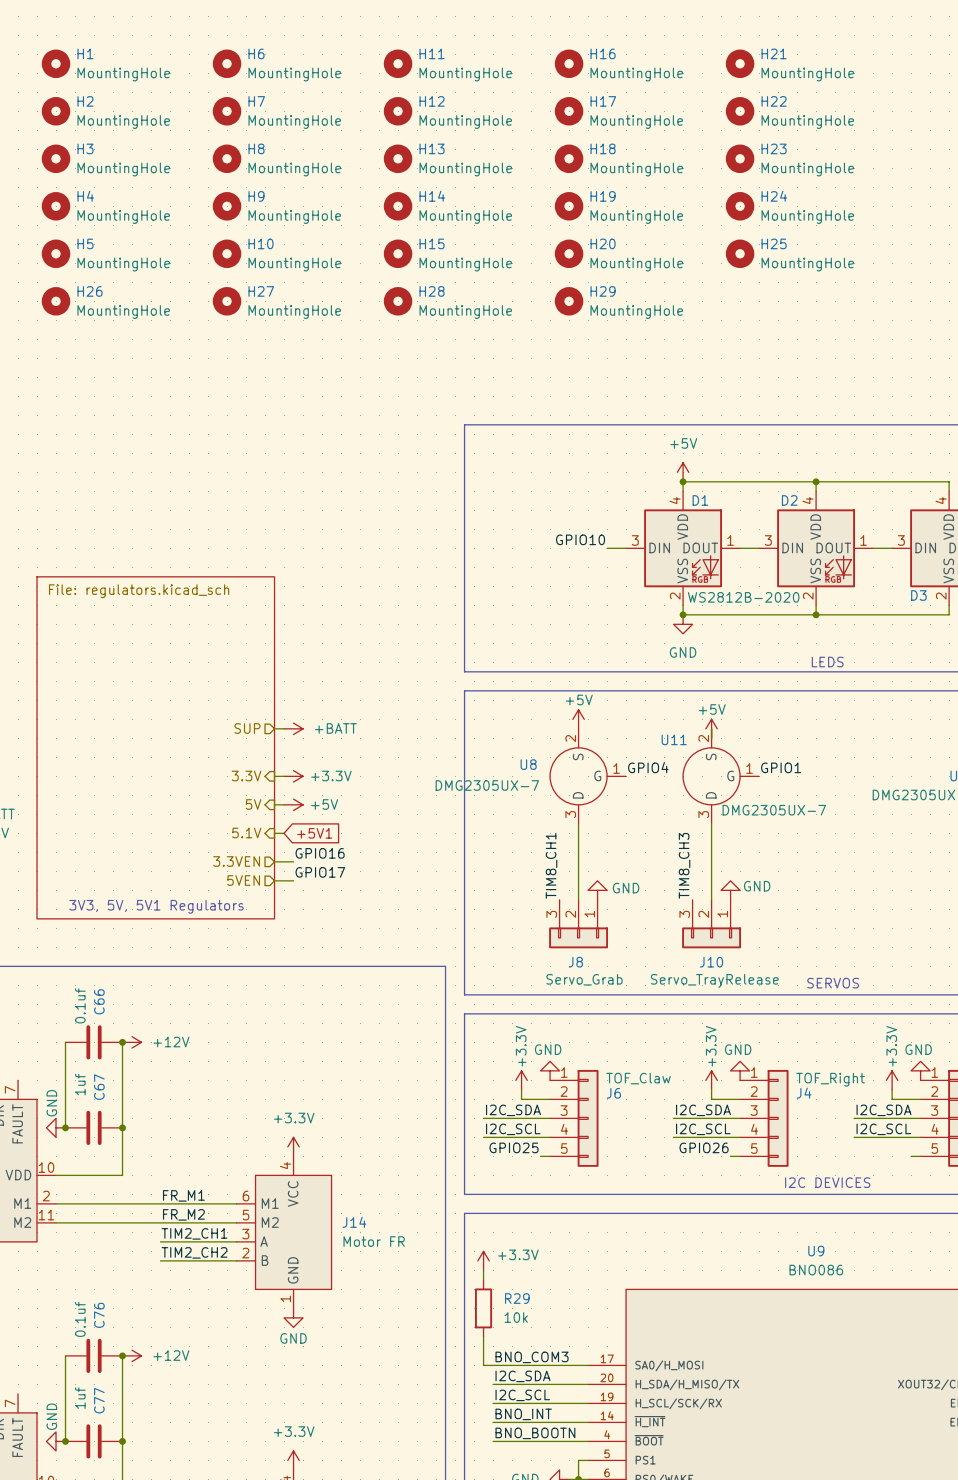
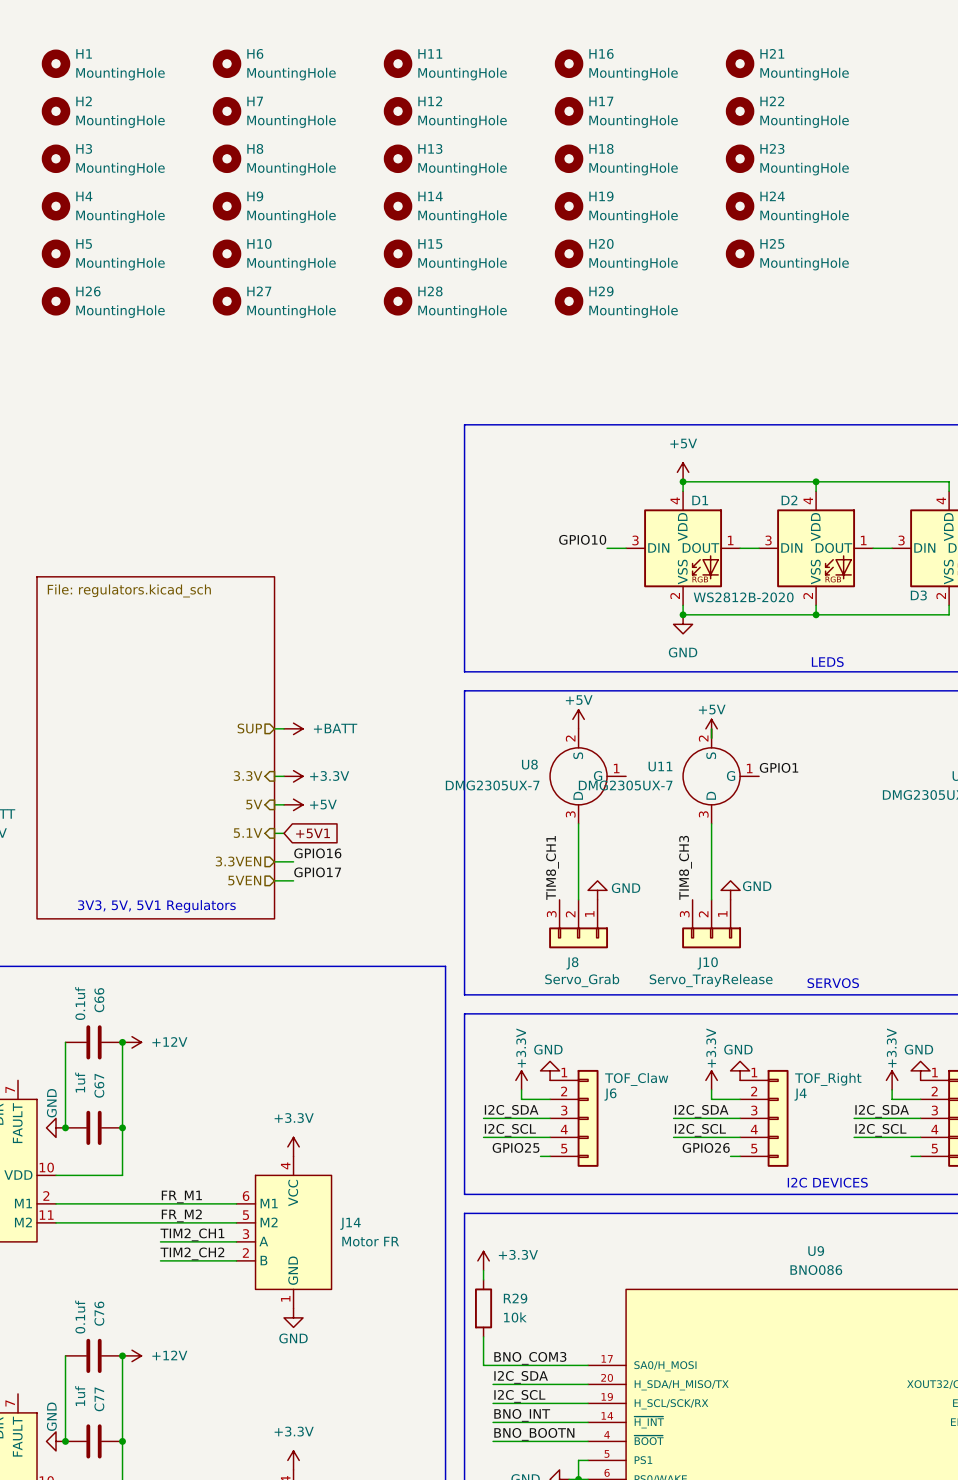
U11 name position: U11 (674, 739) -> U11 (660, 766)
label: GPIO4 (648, 767) -> none
U11 value position: DMG2305UX-7 (774, 810) -> DMG2305UX-7 (625, 785)

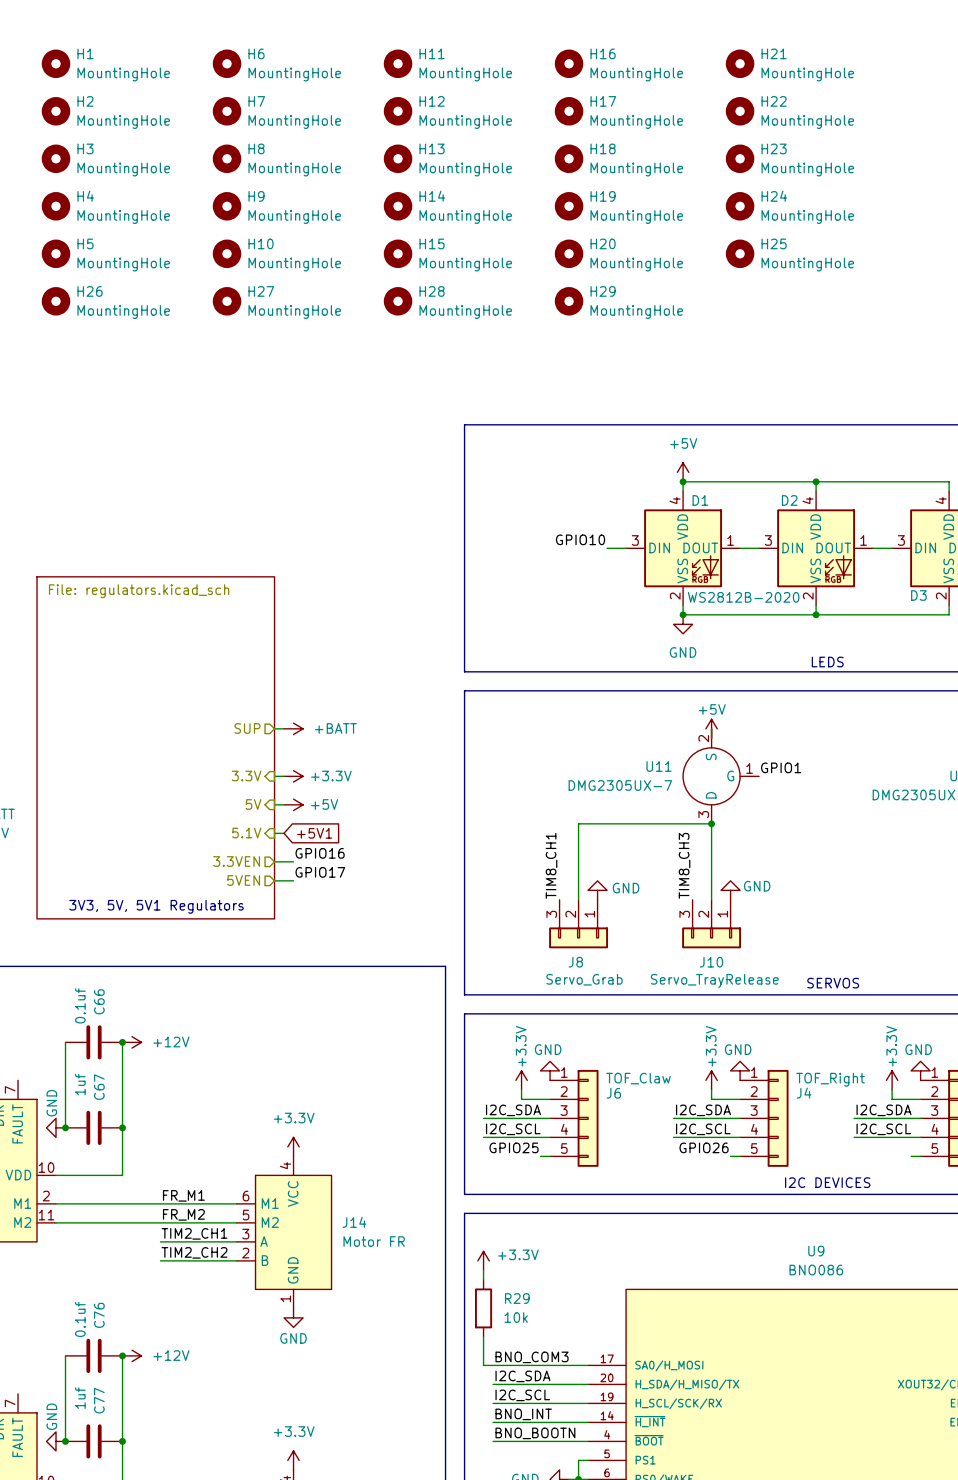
power symbol: +5V (578, 719) -> none
U8: DMG2305UX-7 (588, 776) -> none
wire: none -> (578, 823) (711, 823)
junction: none -> (711, 823)

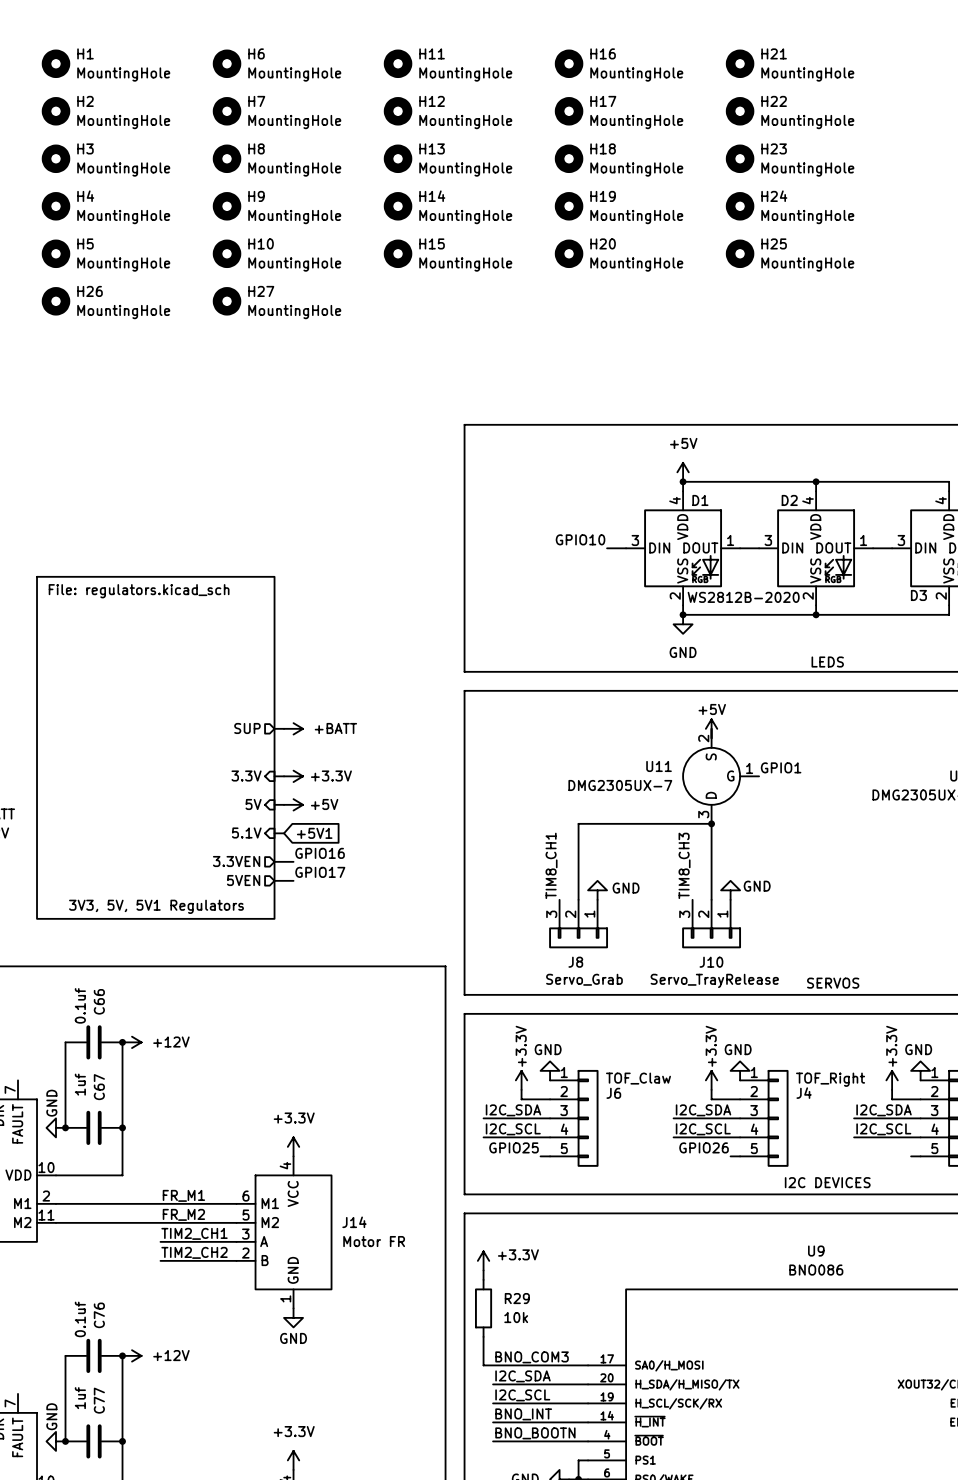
H28: MountingHole (398, 301) -> none
H29: MountingHole (569, 301) -> none

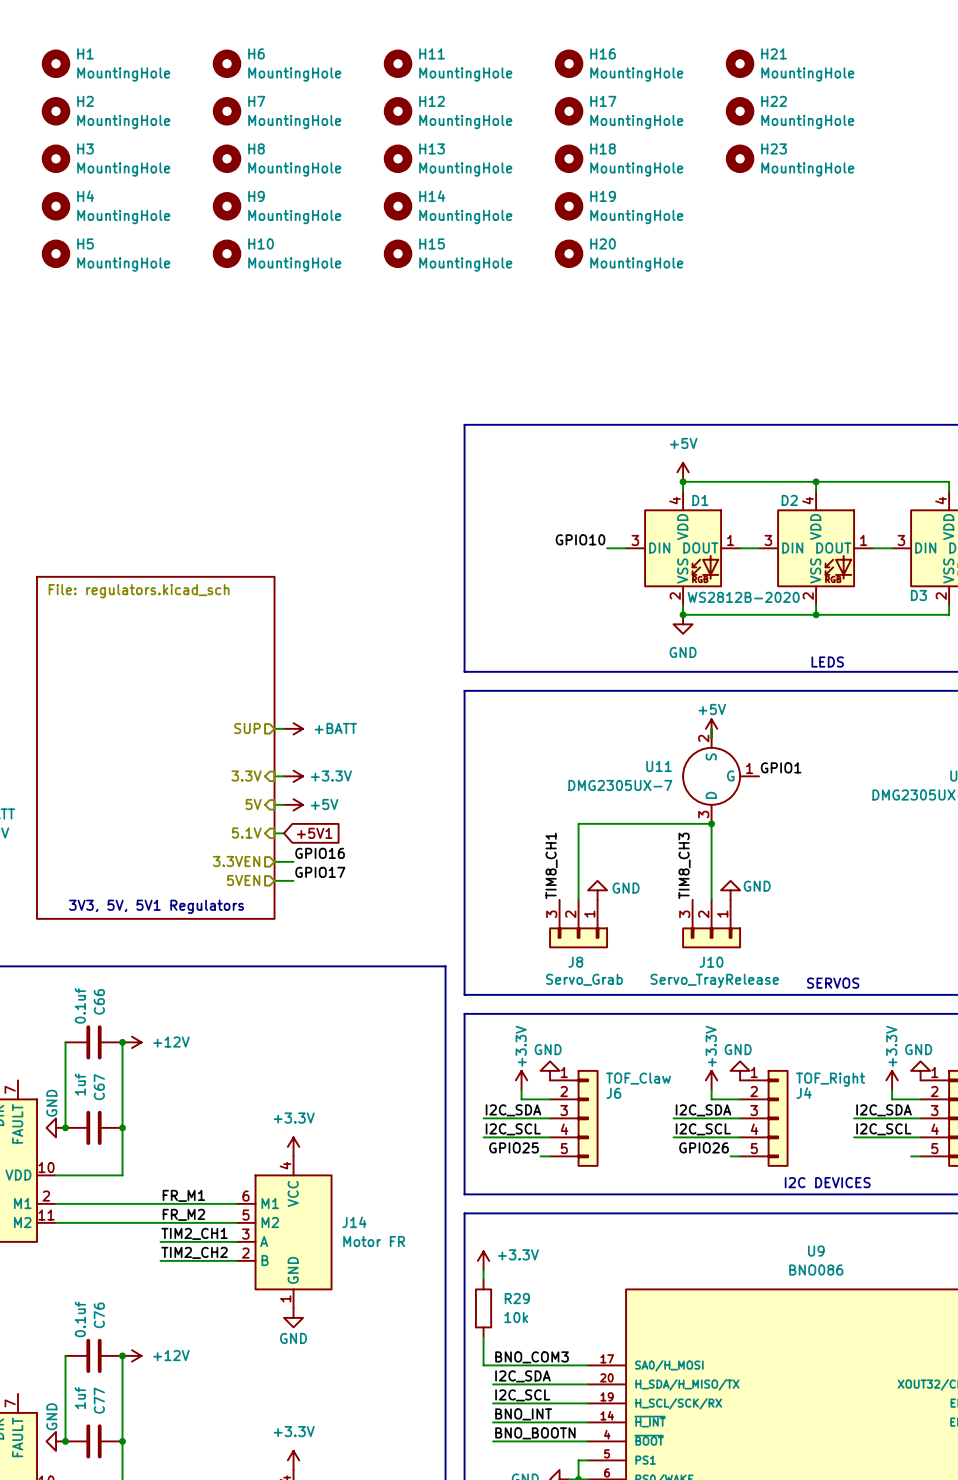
H24: MountingHole (740, 206) -> none
H25: MountingHole (740, 253) -> none
H26: MountingHole (56, 301) -> none
H27: MountingHole (227, 301) -> none

